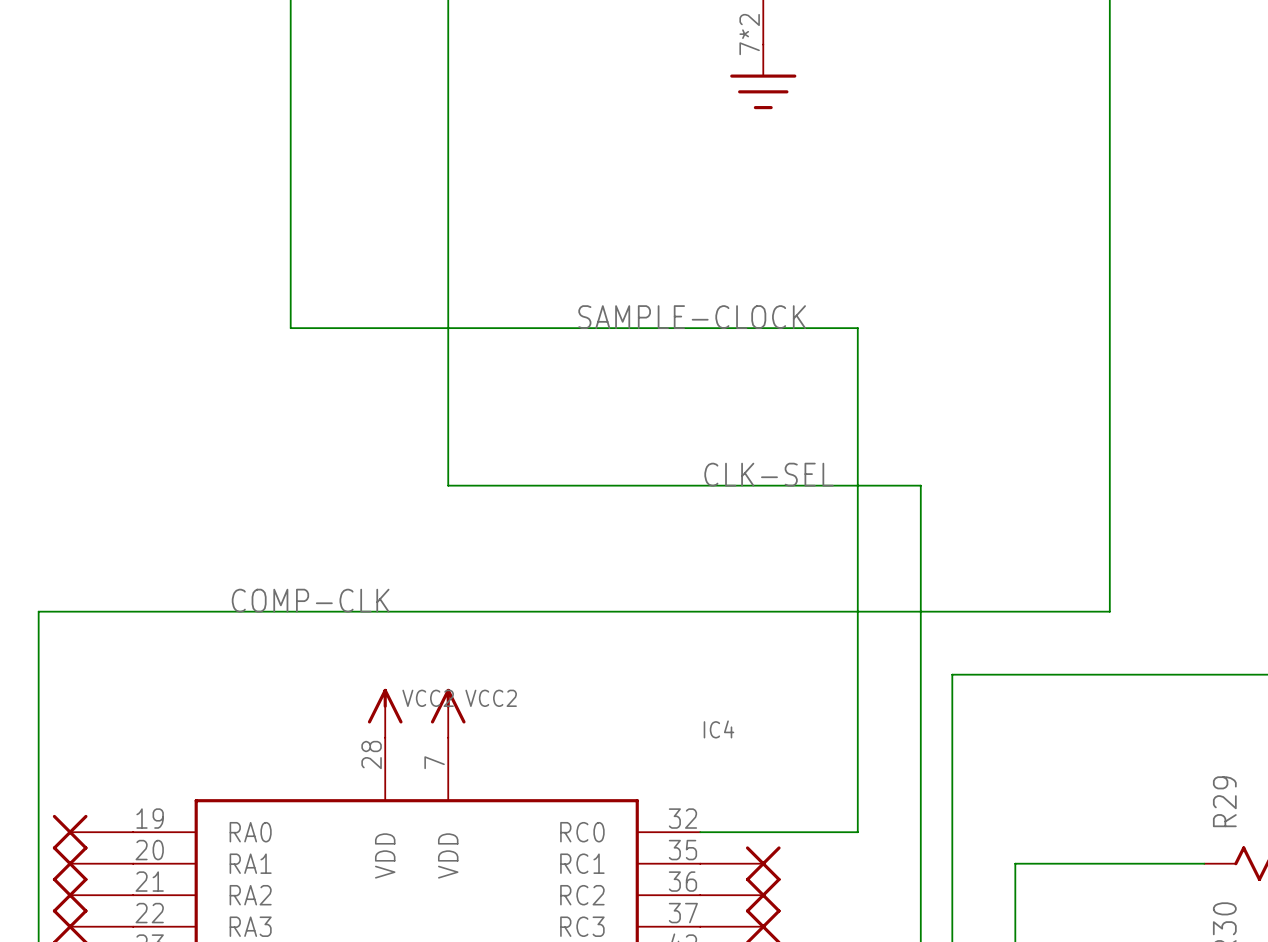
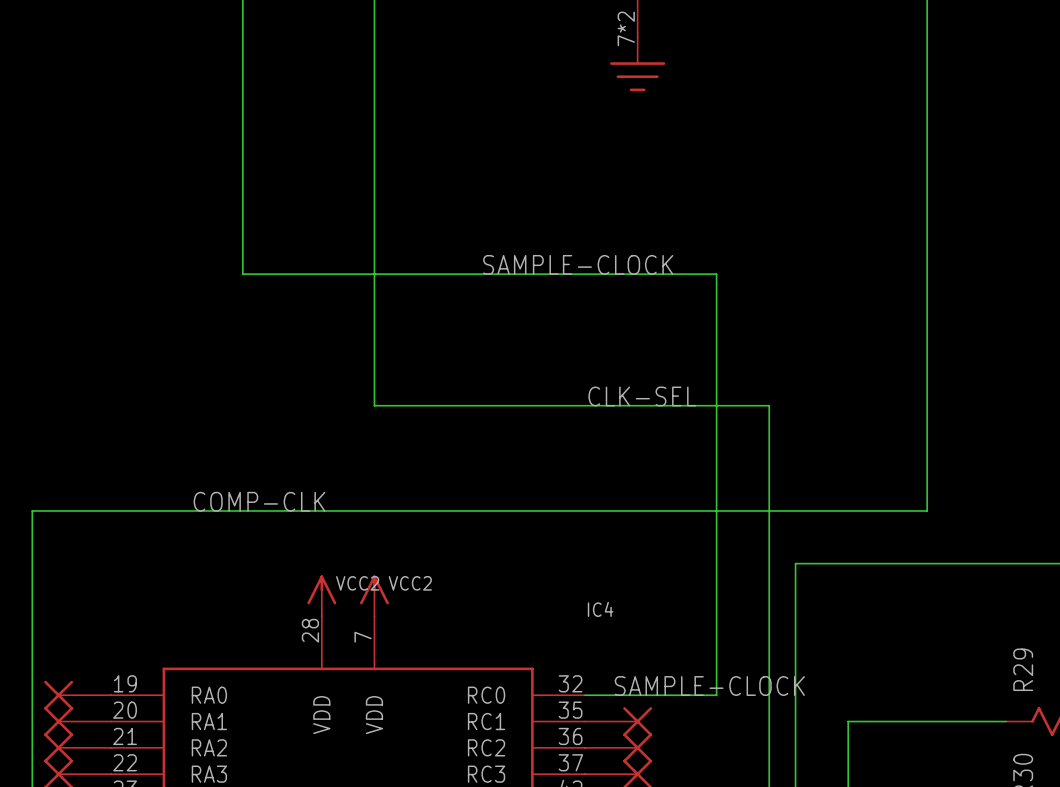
label: none -> SAMPLE-CLOCK (709, 686)

